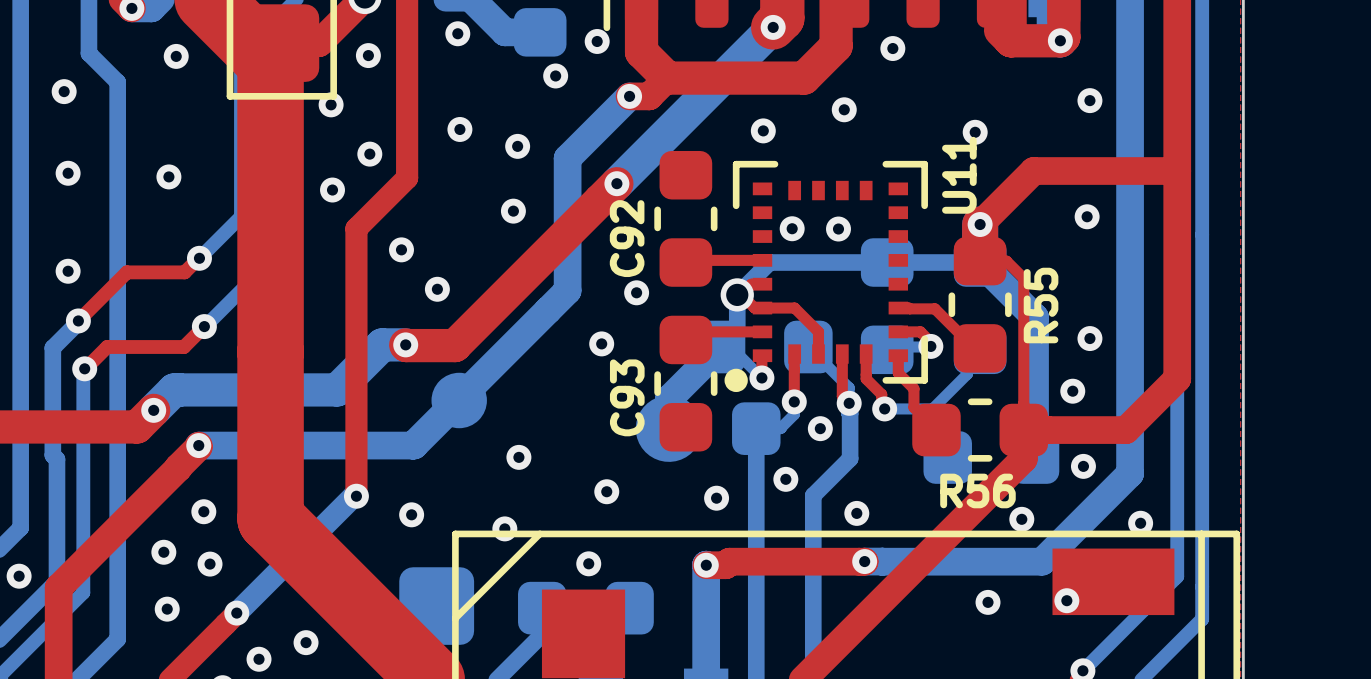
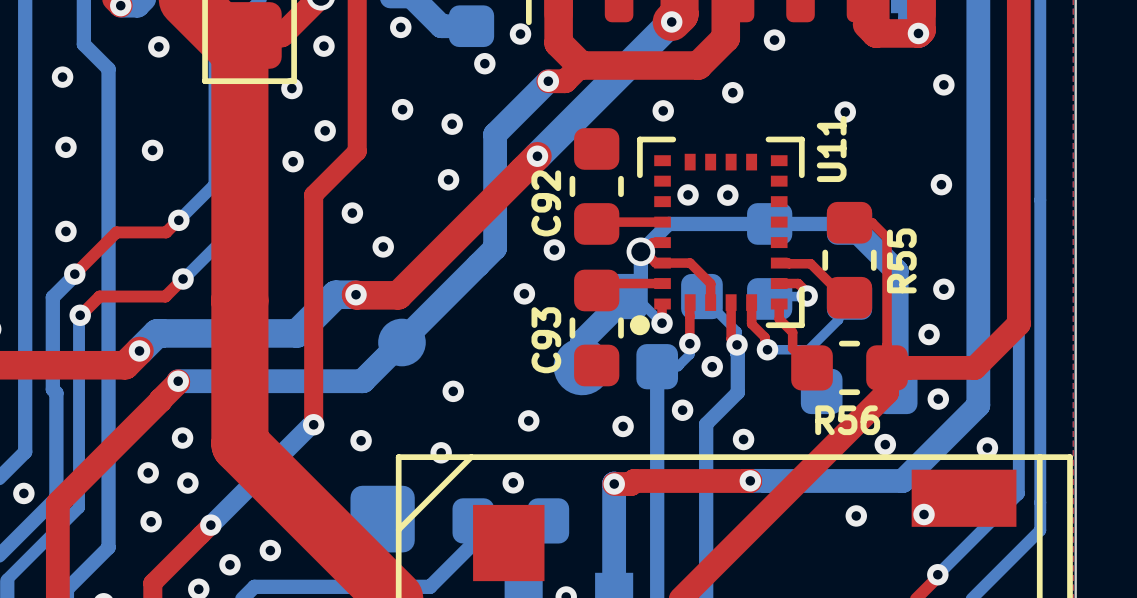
top track: (1177, 171) (1033, 171) (980, 224) (980, 261) -> none
via: (980, 224) -> none

